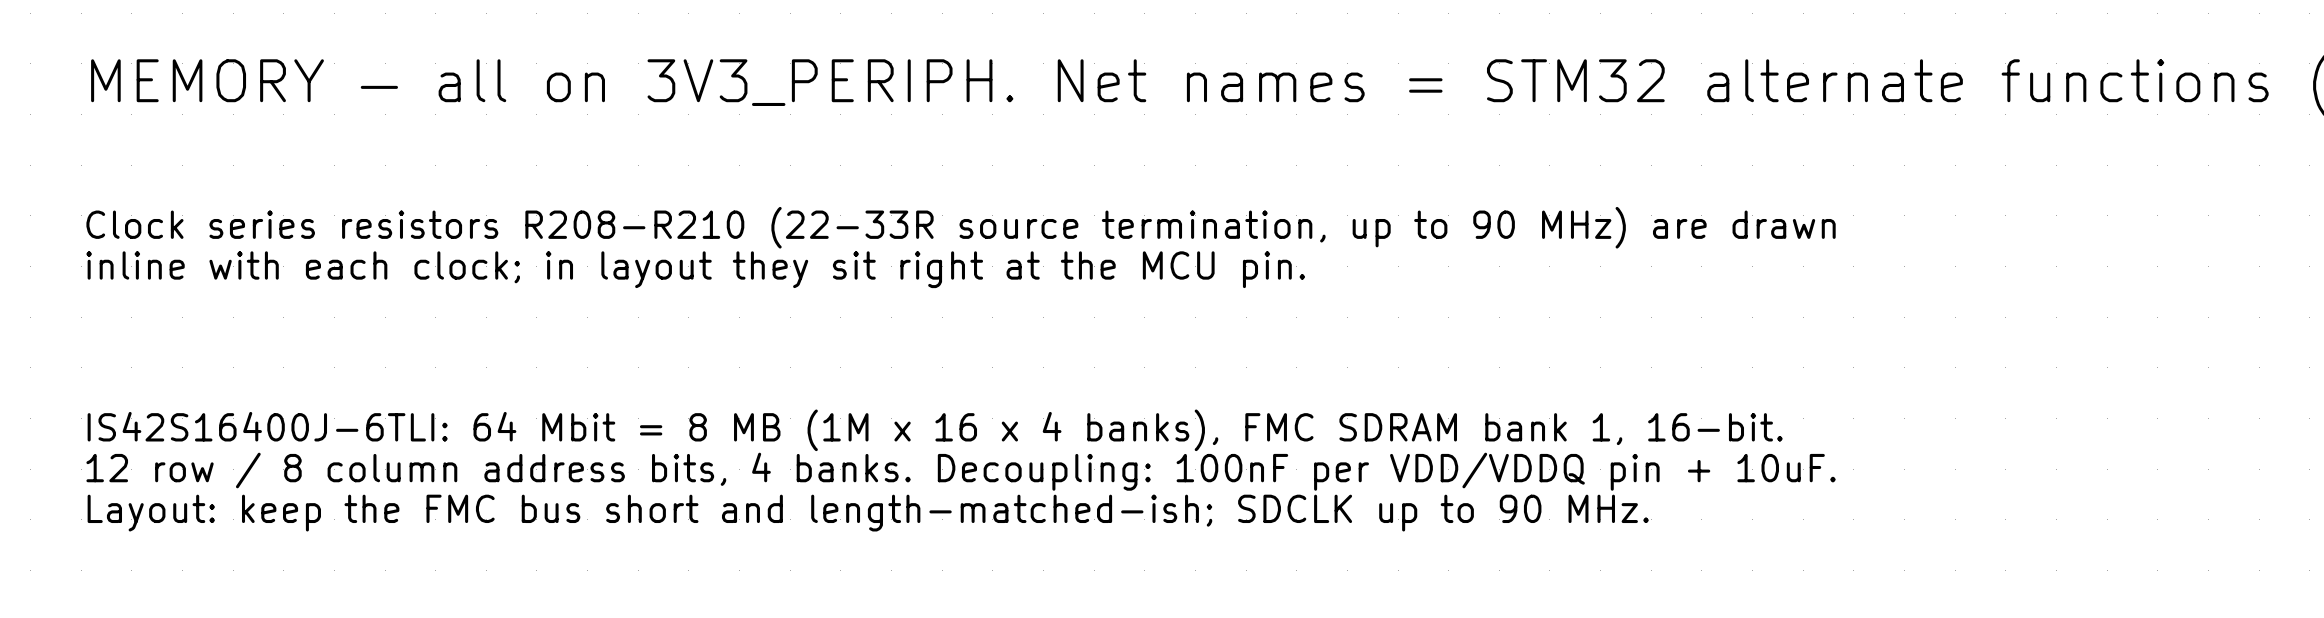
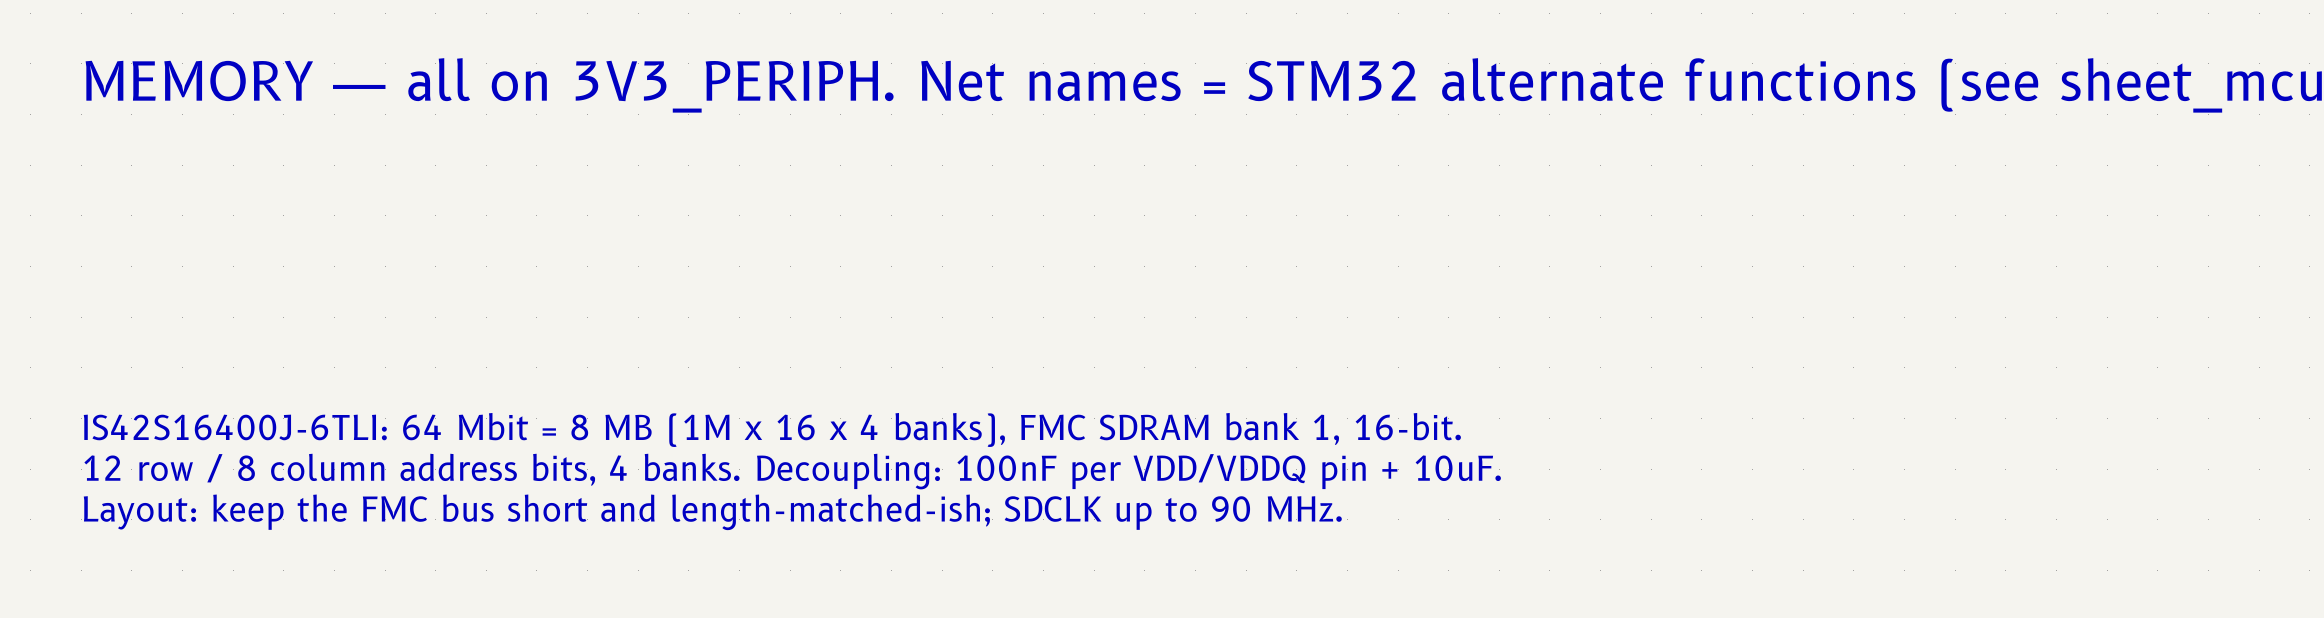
text: Clock series resistors R208-R210 (22-33R source termination, up to 90 MHz) are drawn (961, 227) -> none
text: inline with each clock; in layout they sit right at the MCU pin. (695, 269) -> none

